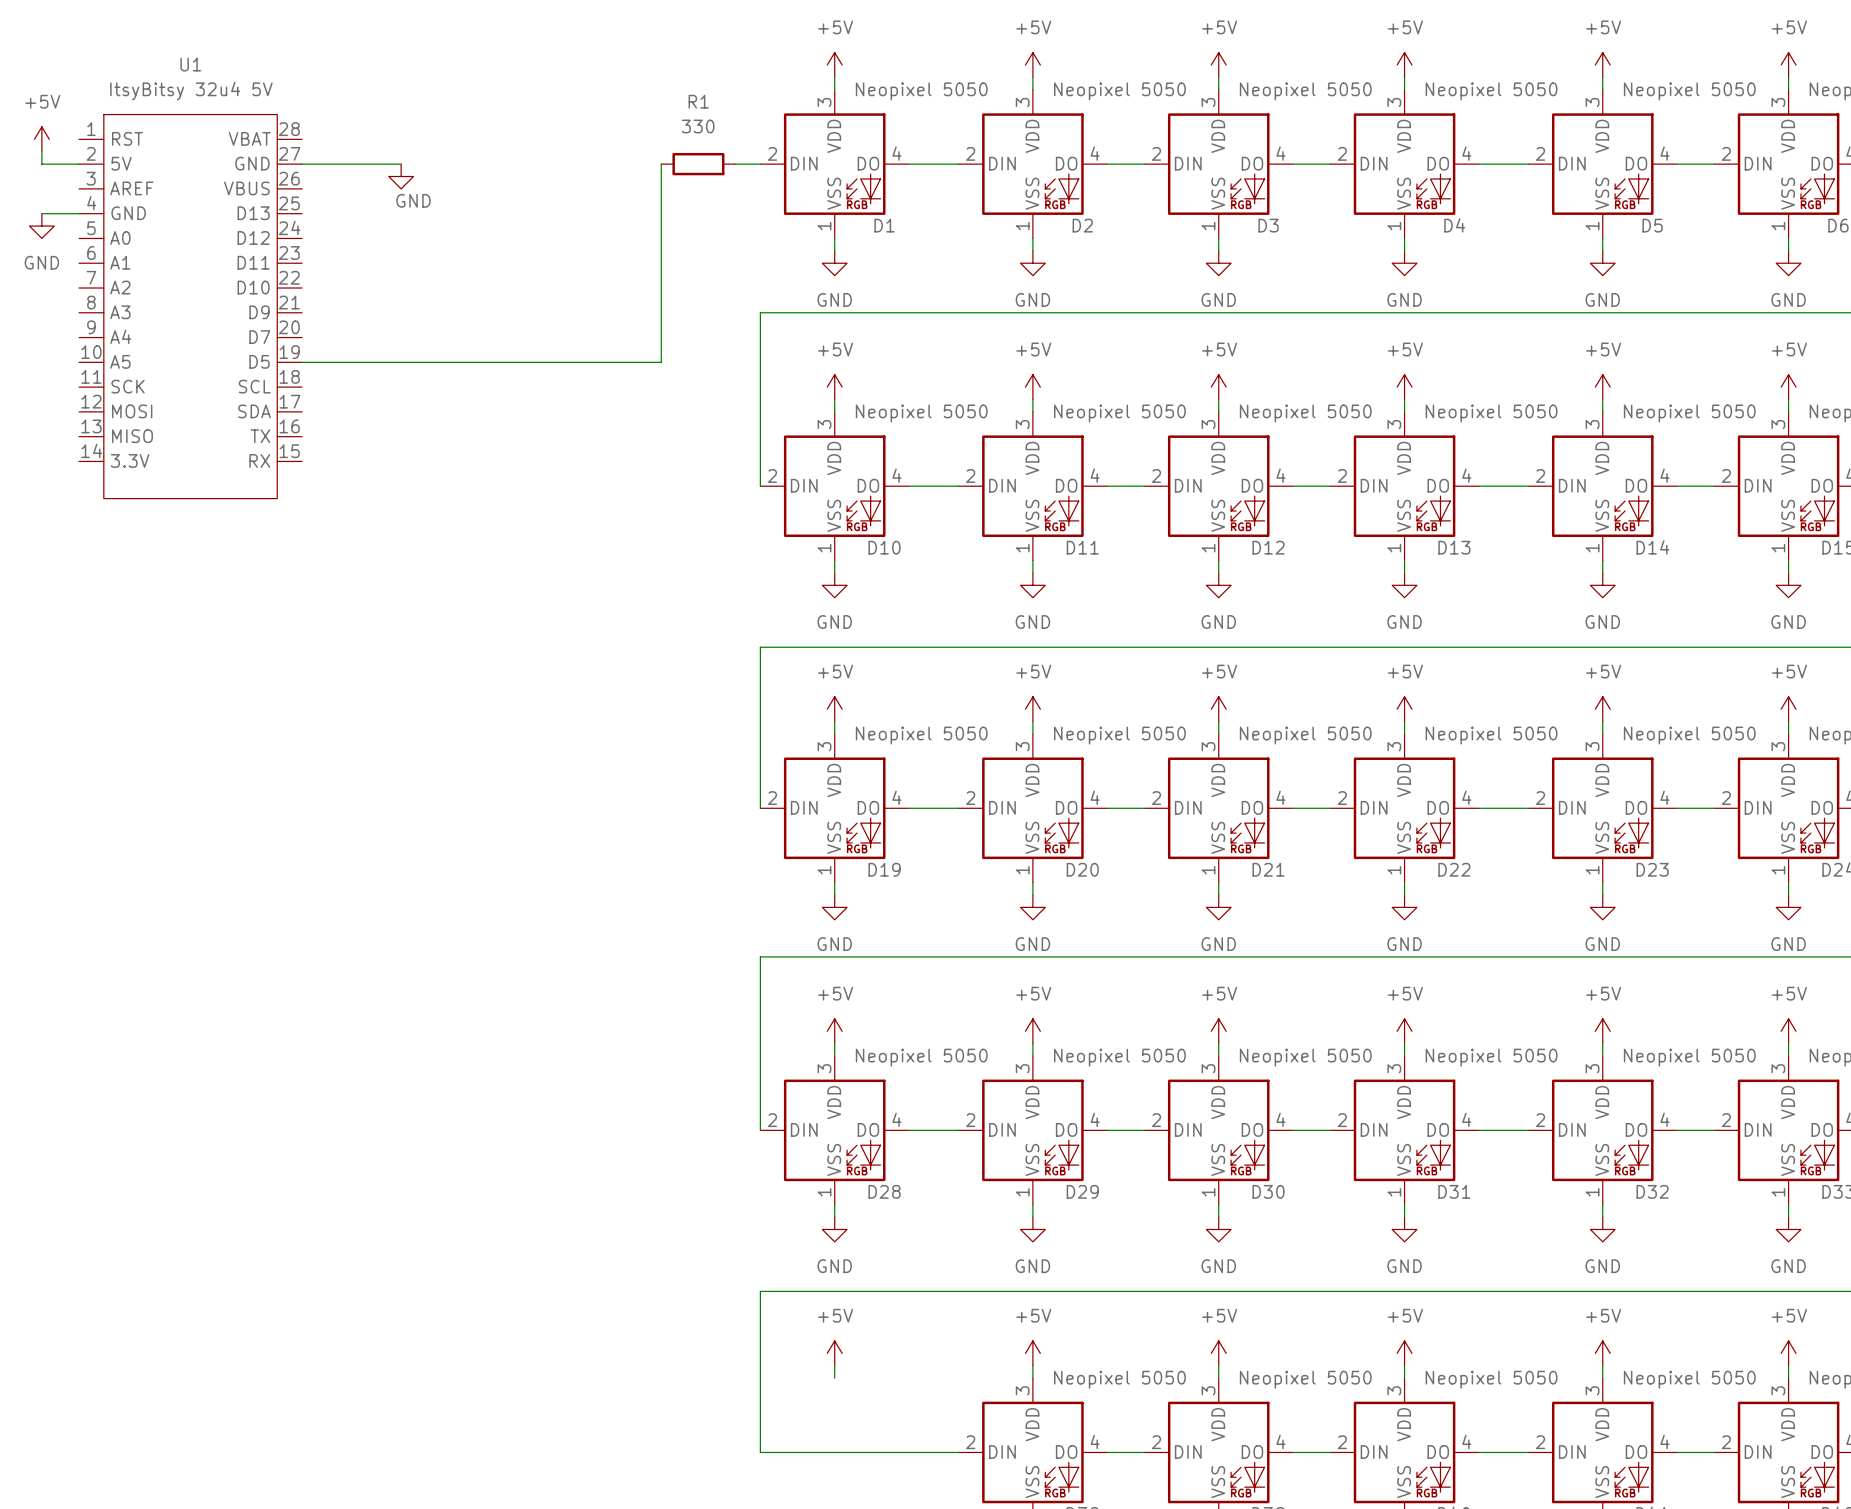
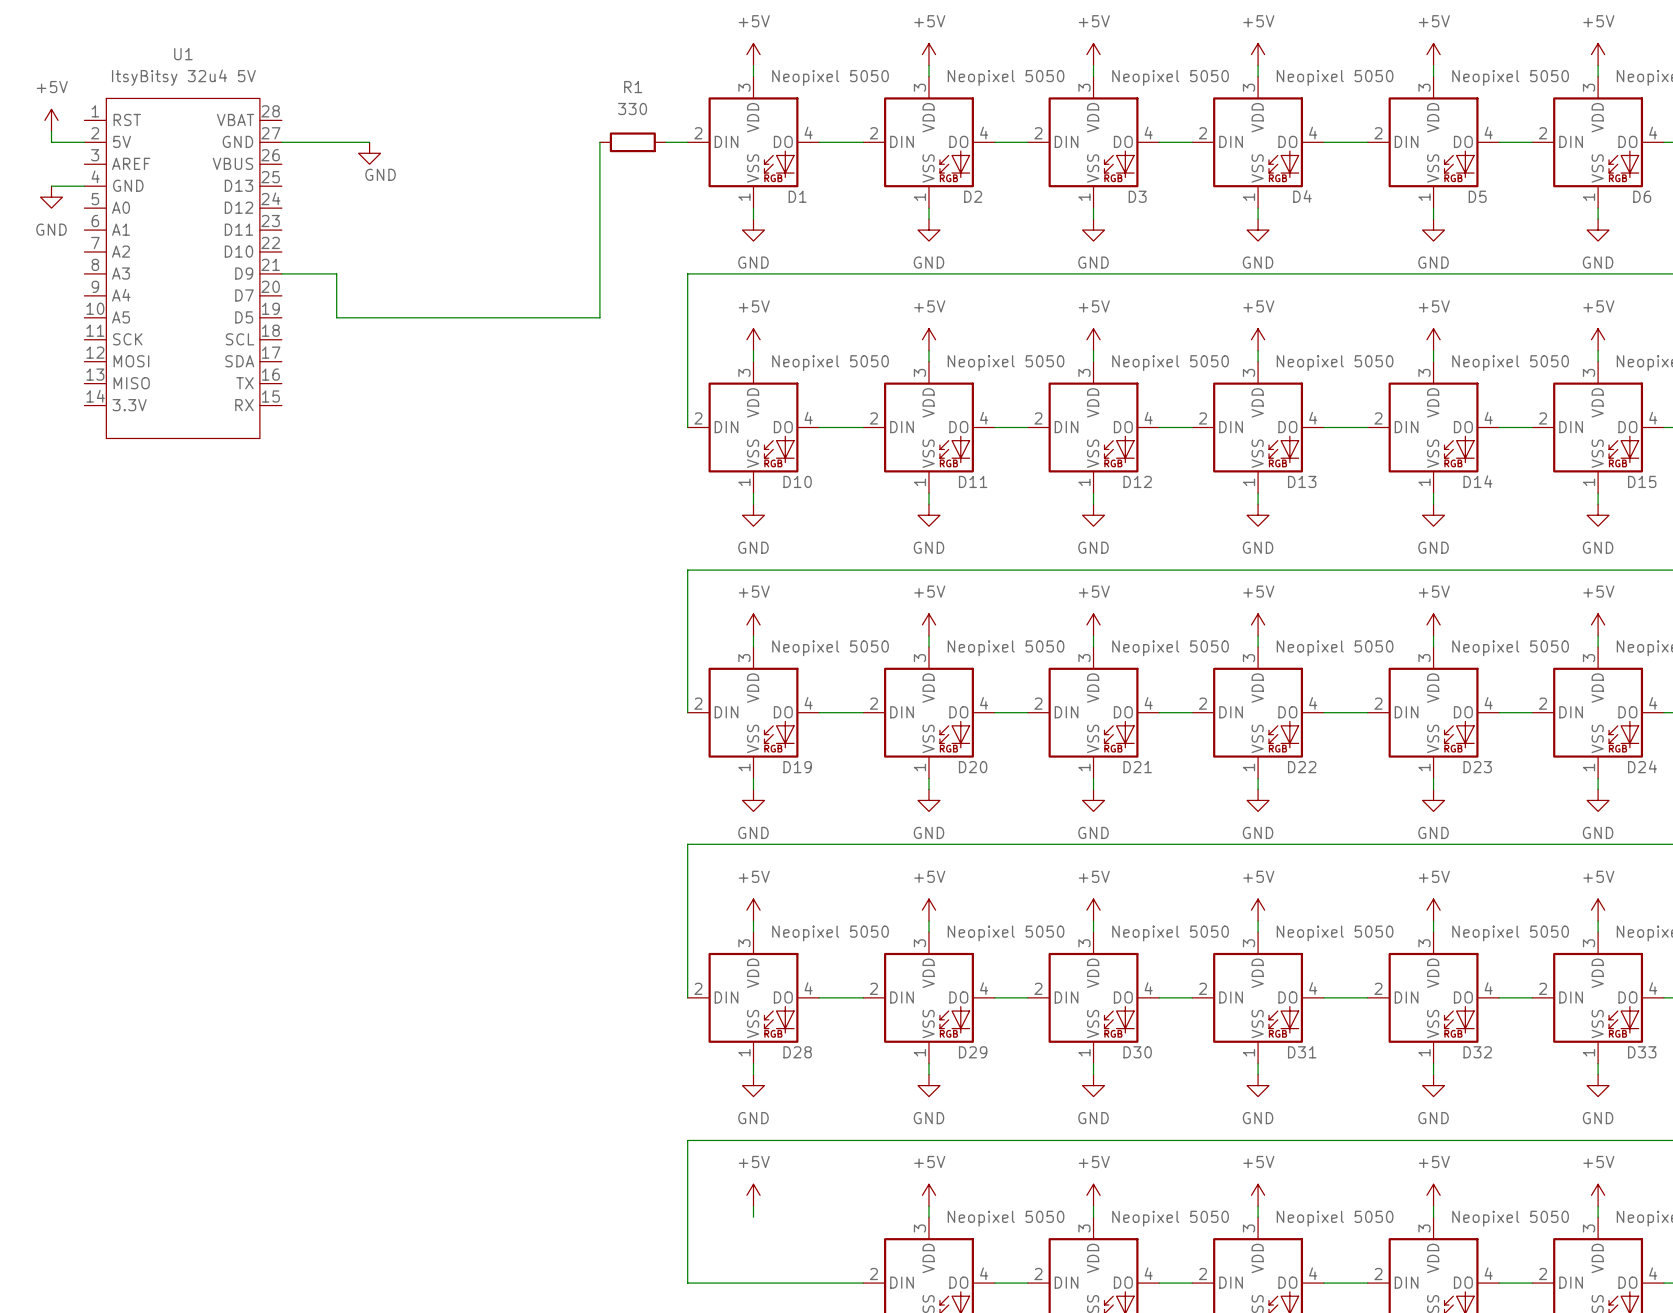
wire: (302, 362) (363, 362) -> (281, 273) (336, 273) (336, 317)

